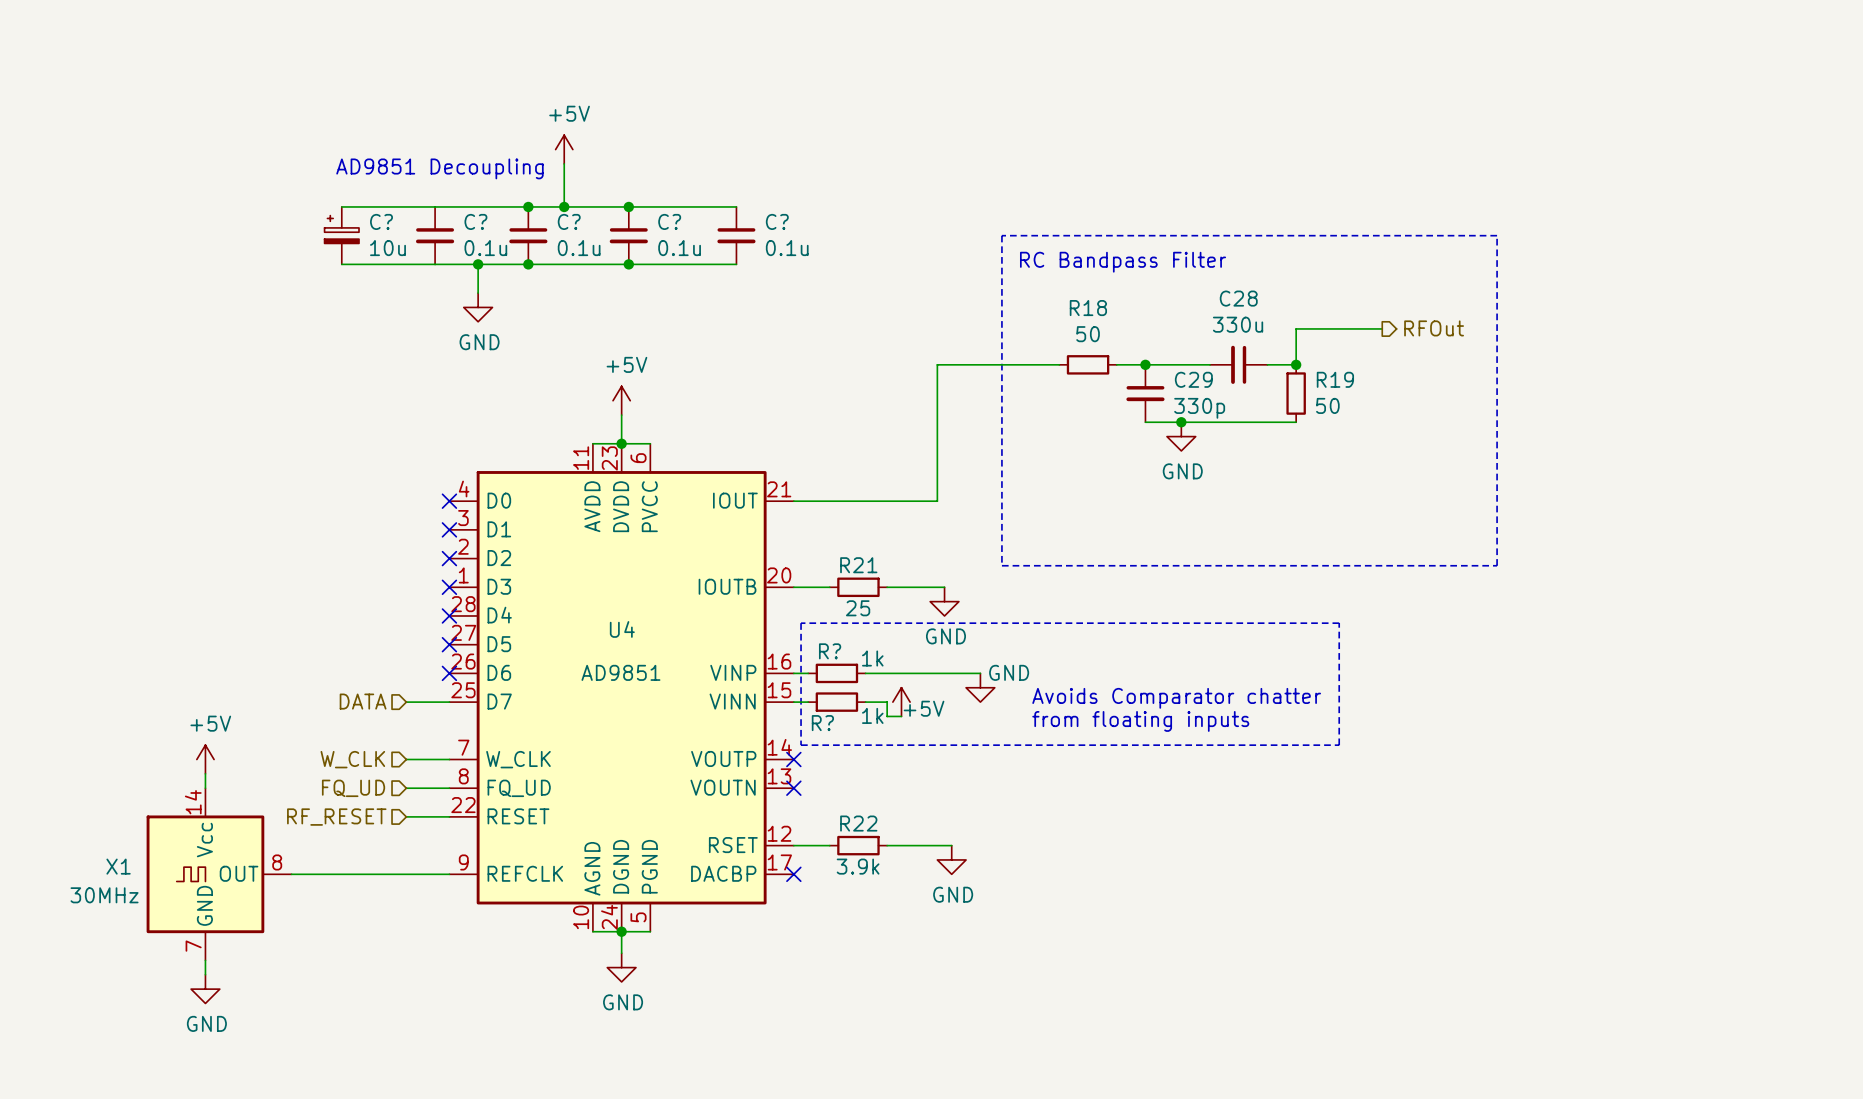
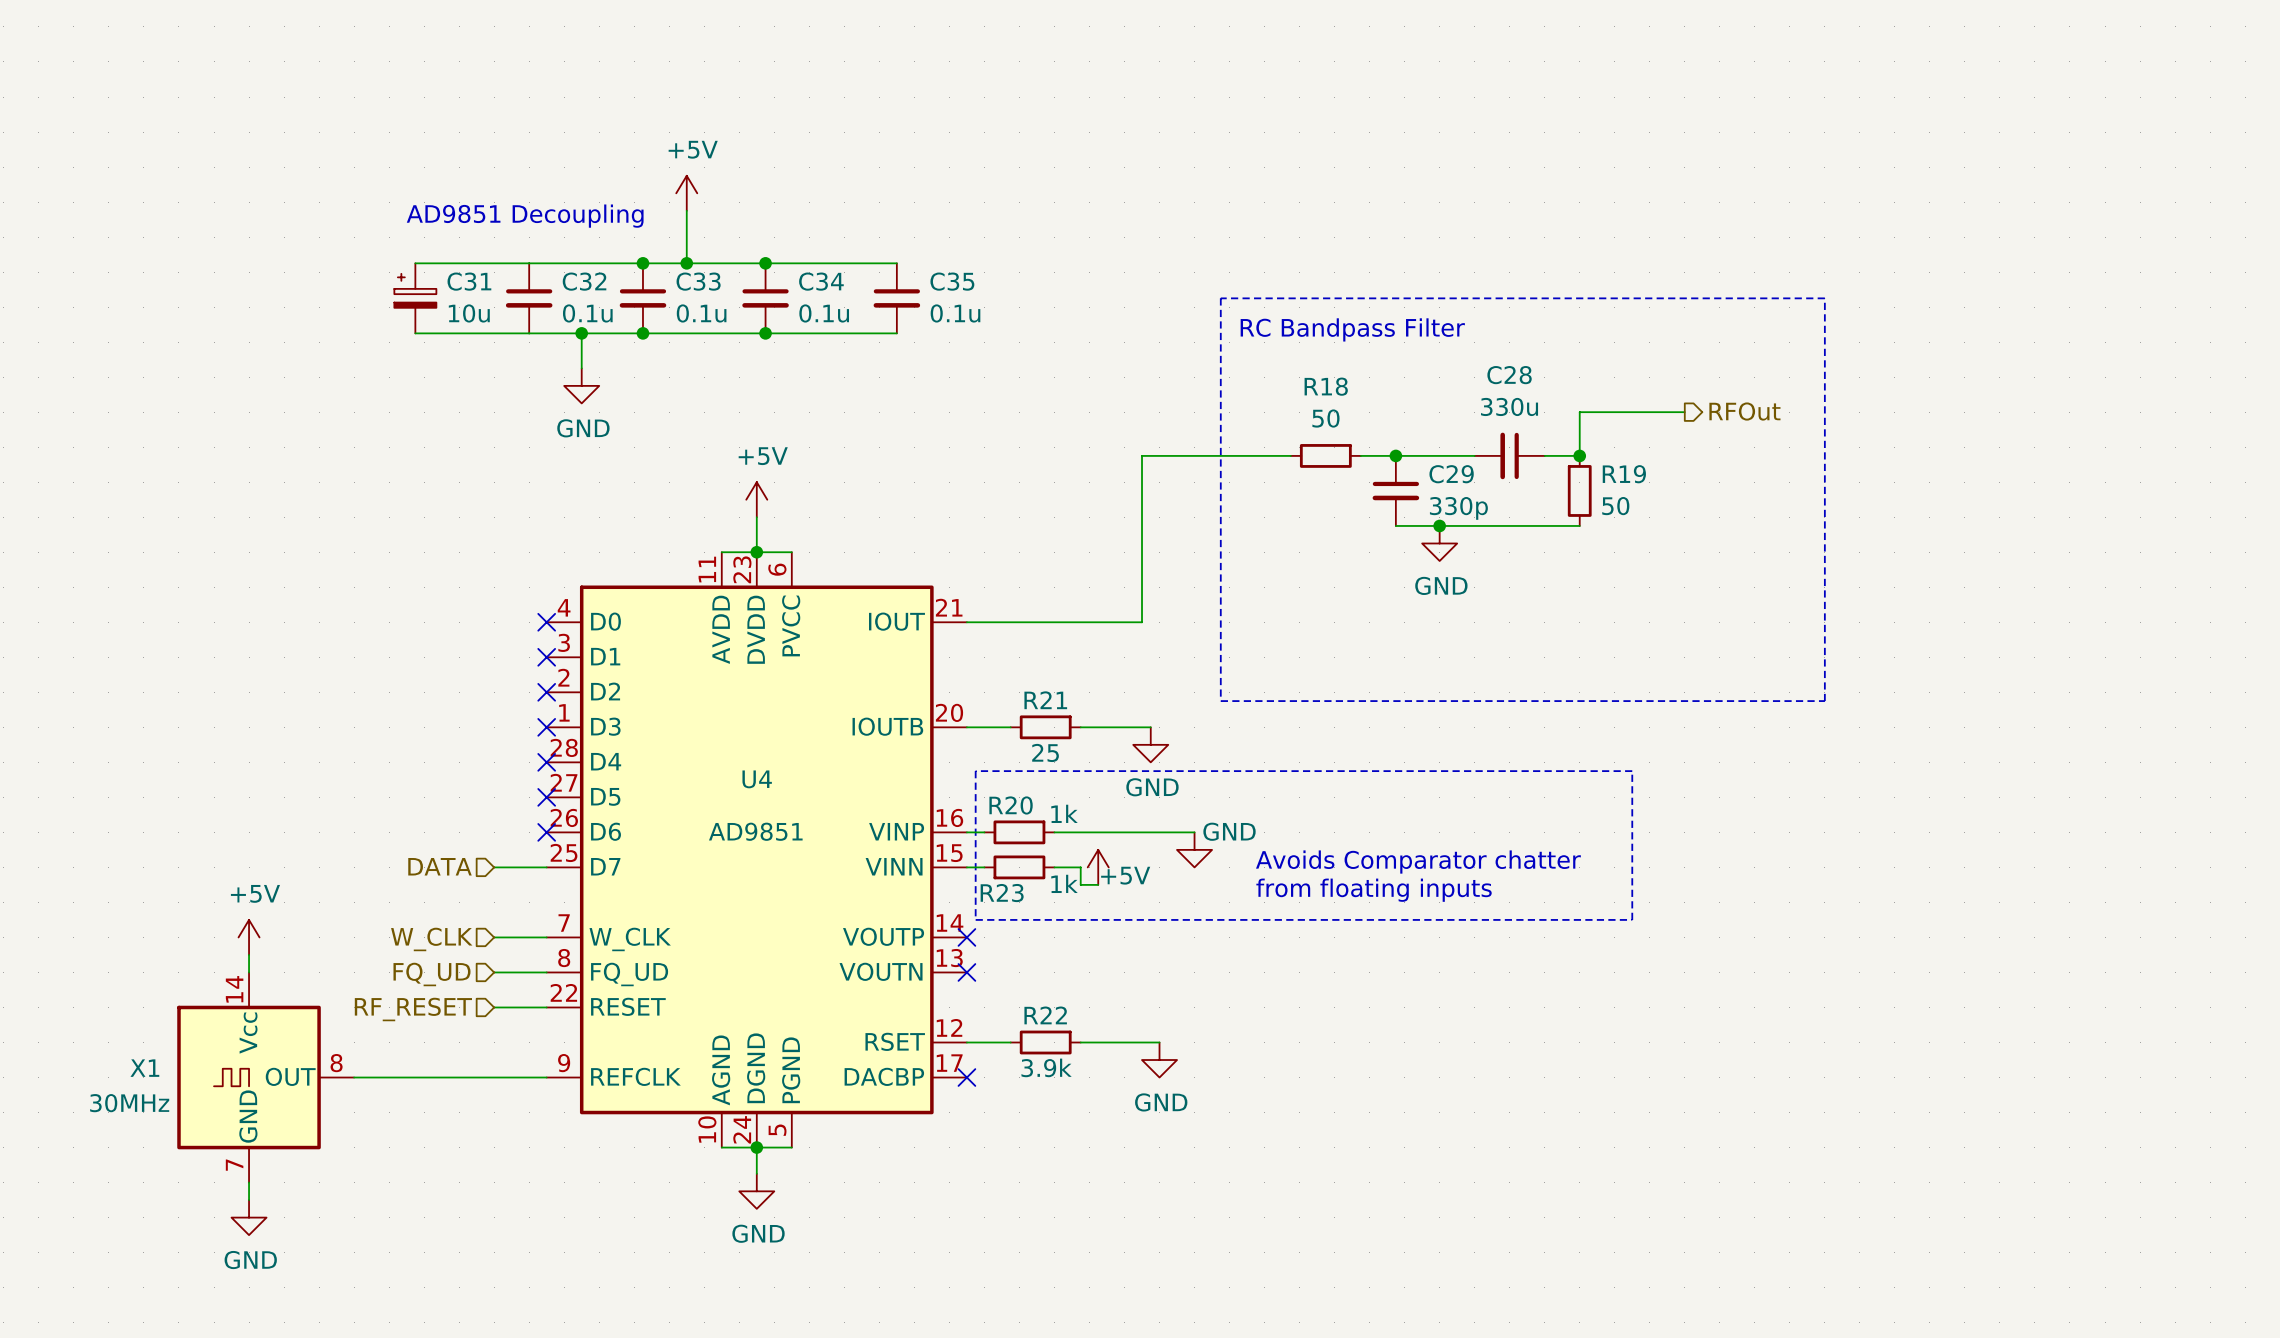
C? name: C? (381, 221) -> C31 (469, 281)
C? name: C? (475, 221) -> C32 (584, 281)
C? name: C? (569, 221) -> C33 (698, 281)
C? name: C? (669, 221) -> C34 (821, 281)
C? name: C? (777, 221) -> C35 (952, 281)
R? name: R? (830, 651) -> R20 (1011, 805)
R? name: R? (822, 723) -> R23 (1002, 893)

